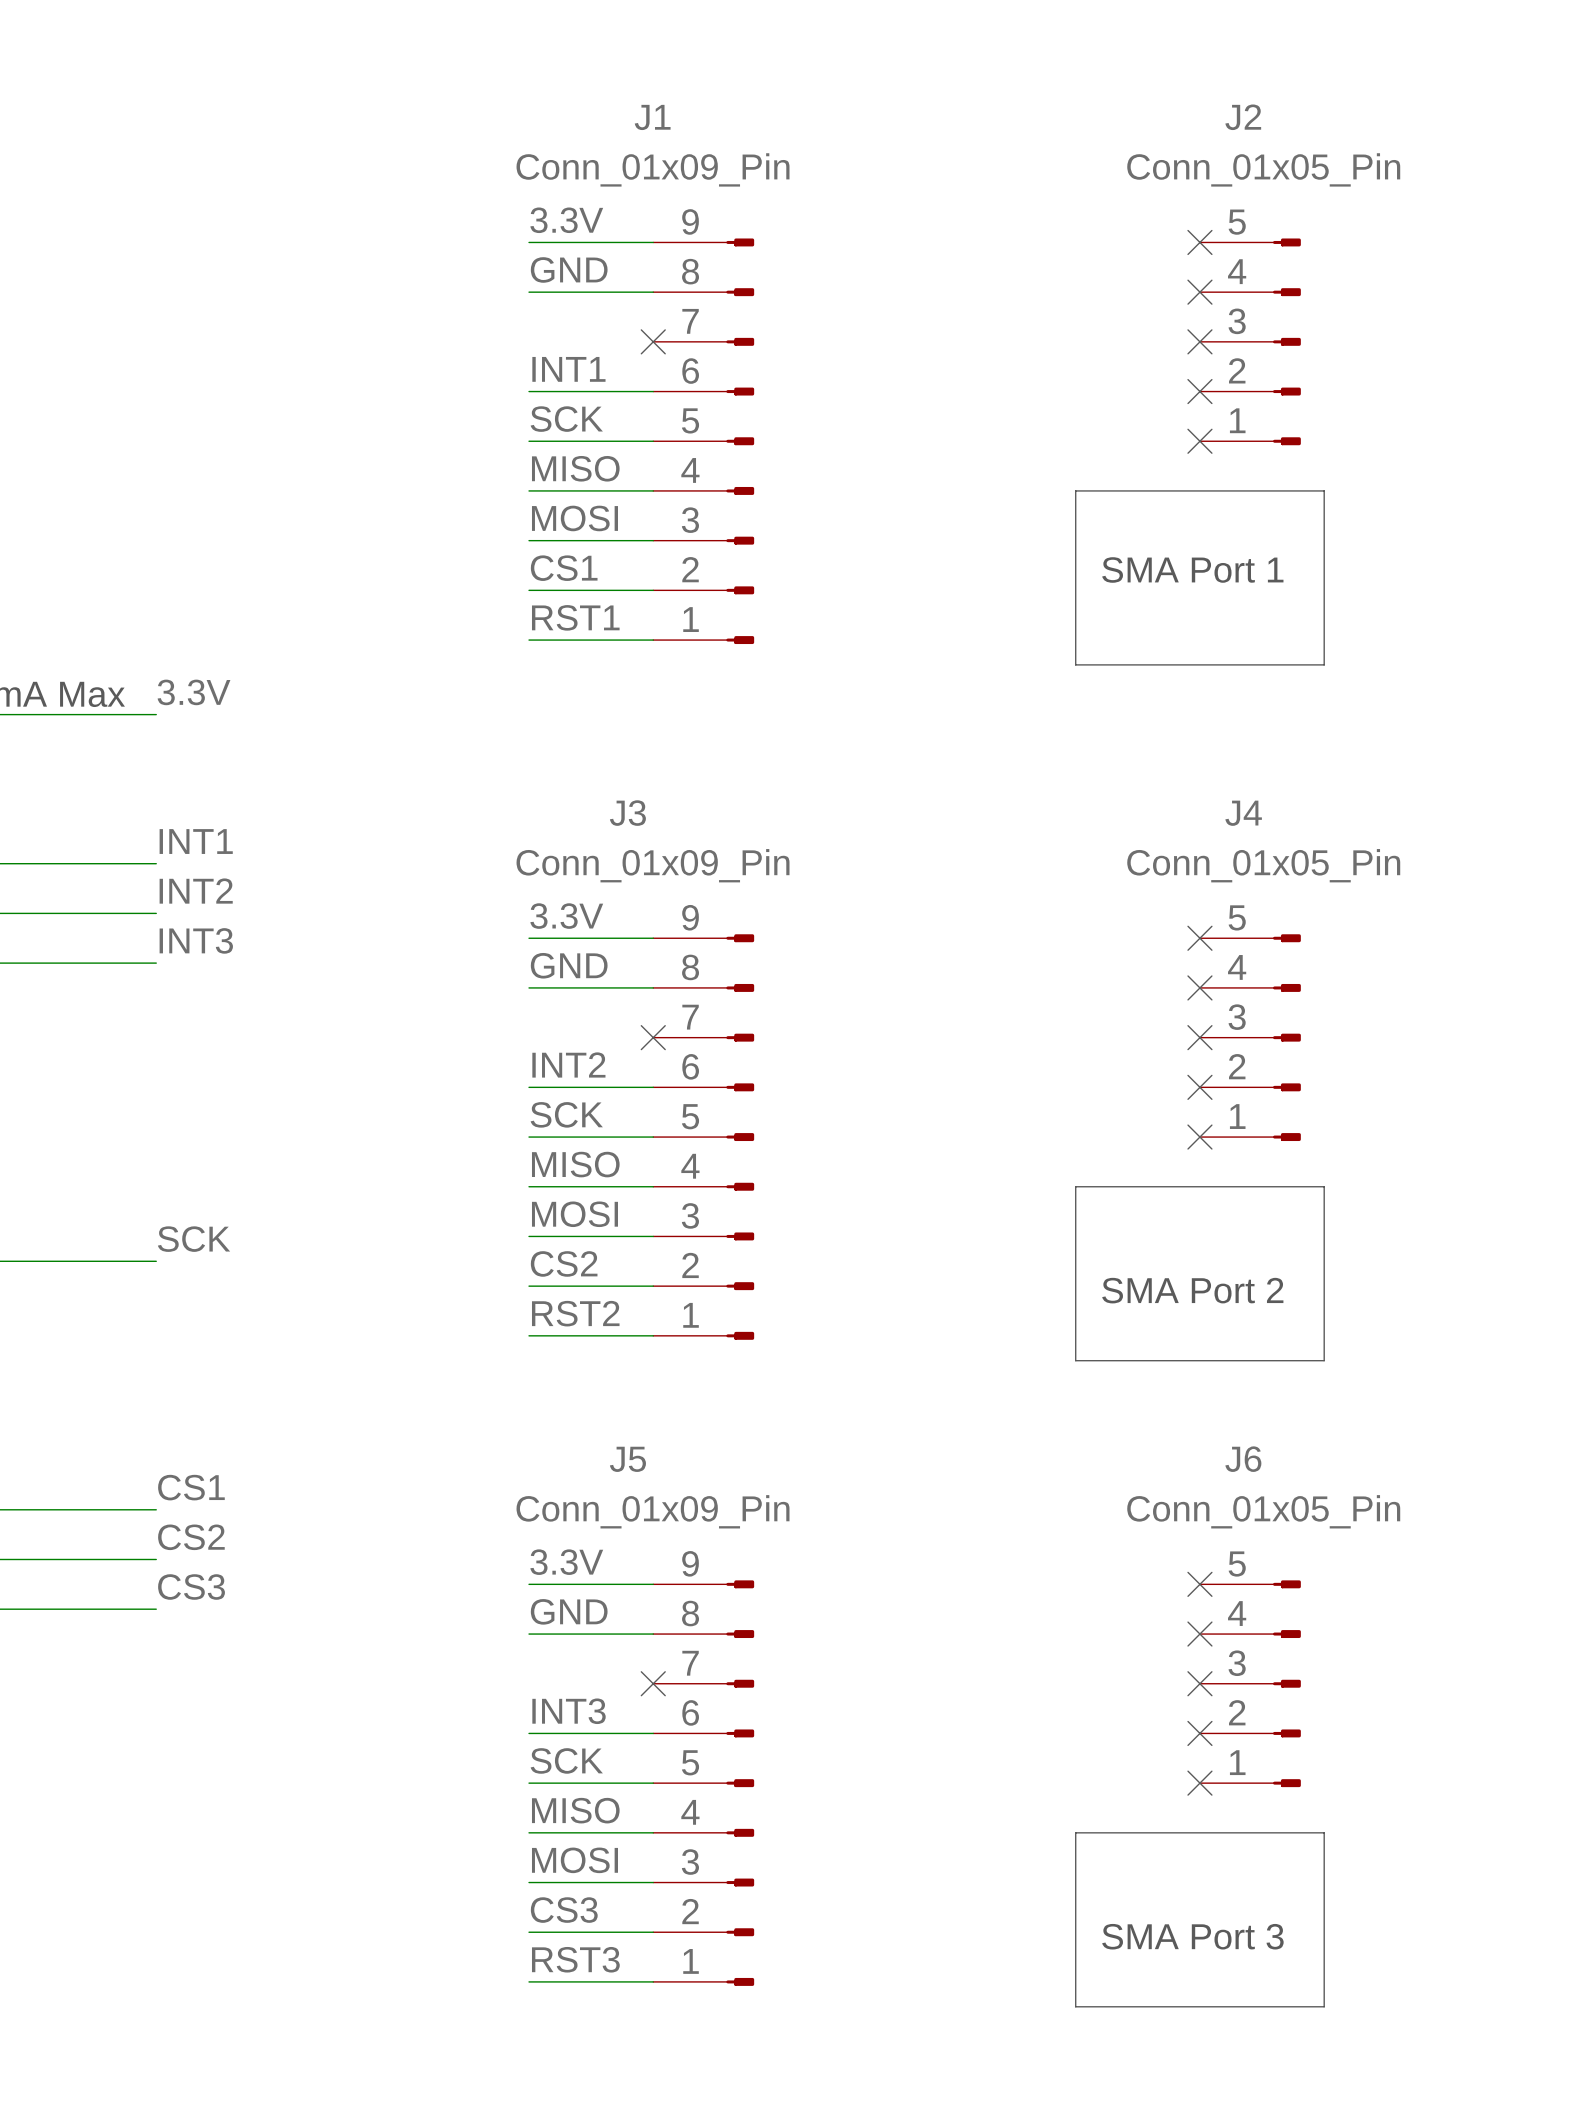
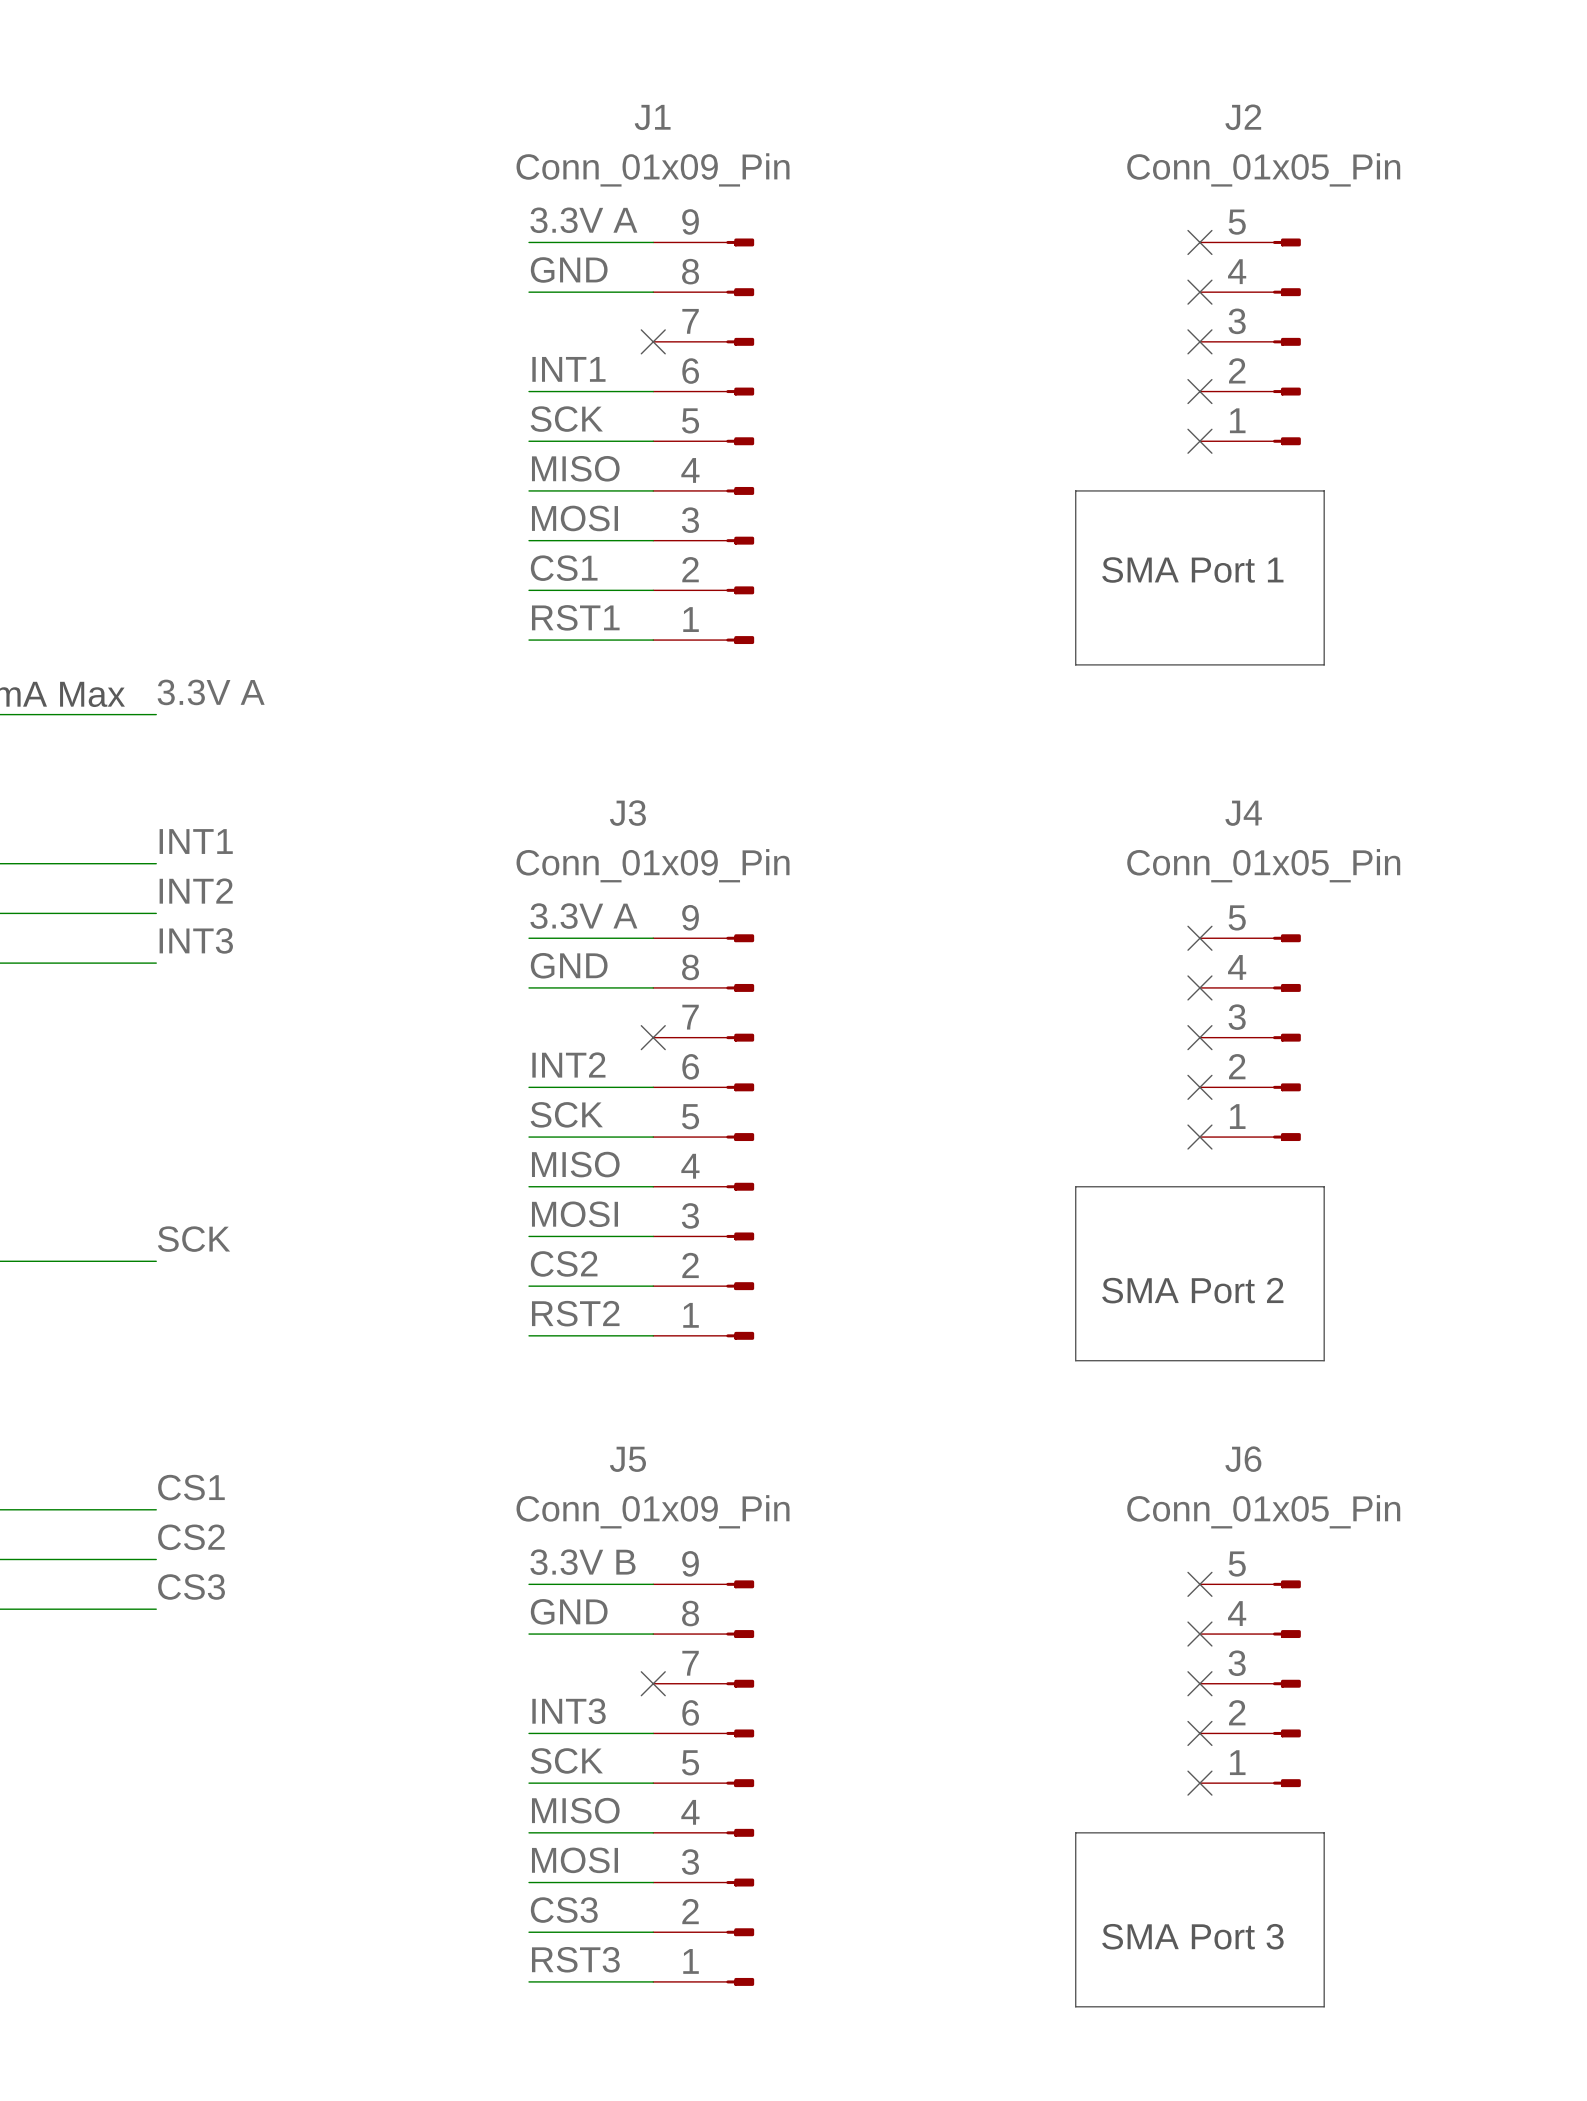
label: 3.3V (566, 220) -> 3.3V A (583, 220)
label: 3.3V (194, 692) -> 3.3V A (211, 692)
label: 3.3V (566, 916) -> 3.3V A (583, 916)
label: 3.3V (566, 1562) -> 3.3V B (582, 1562)

